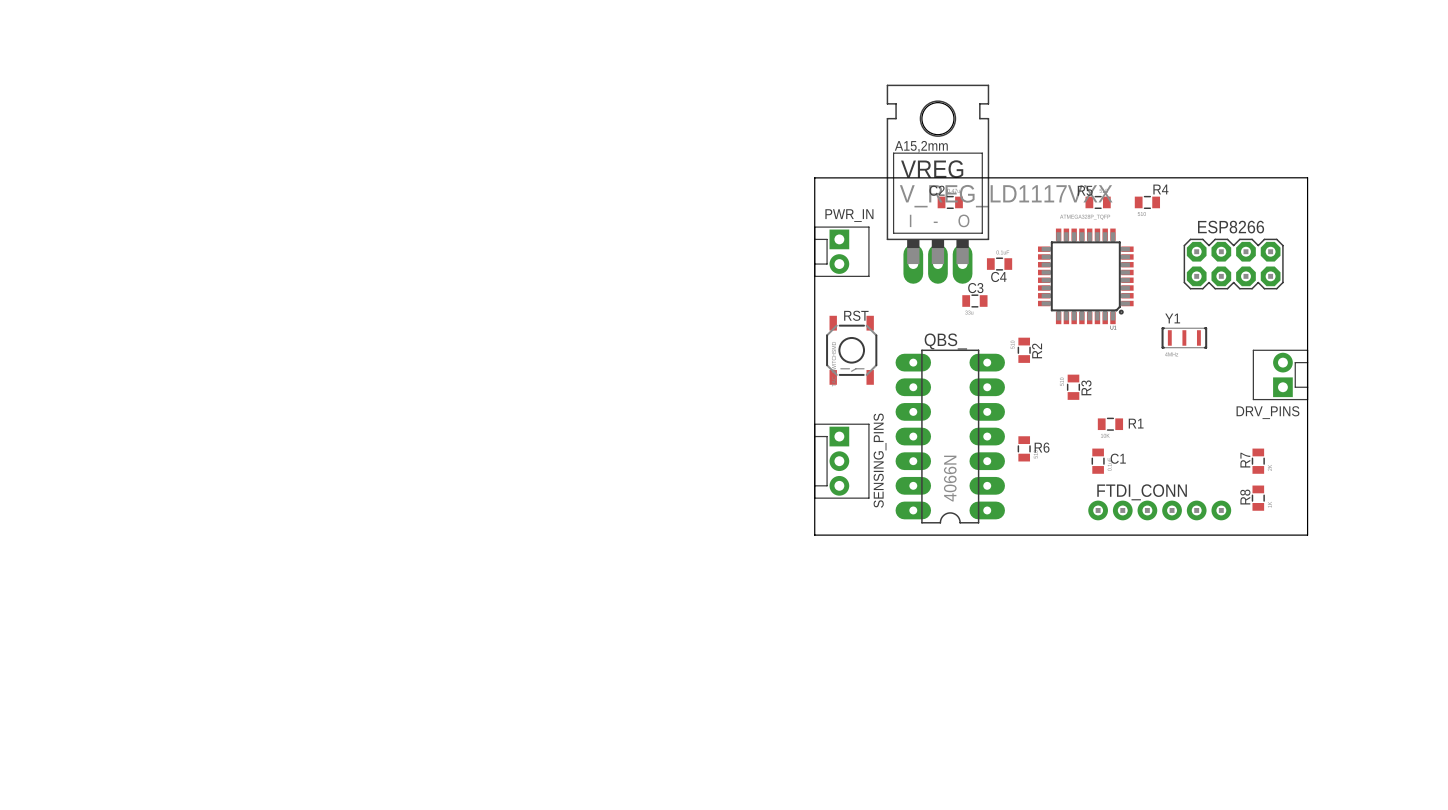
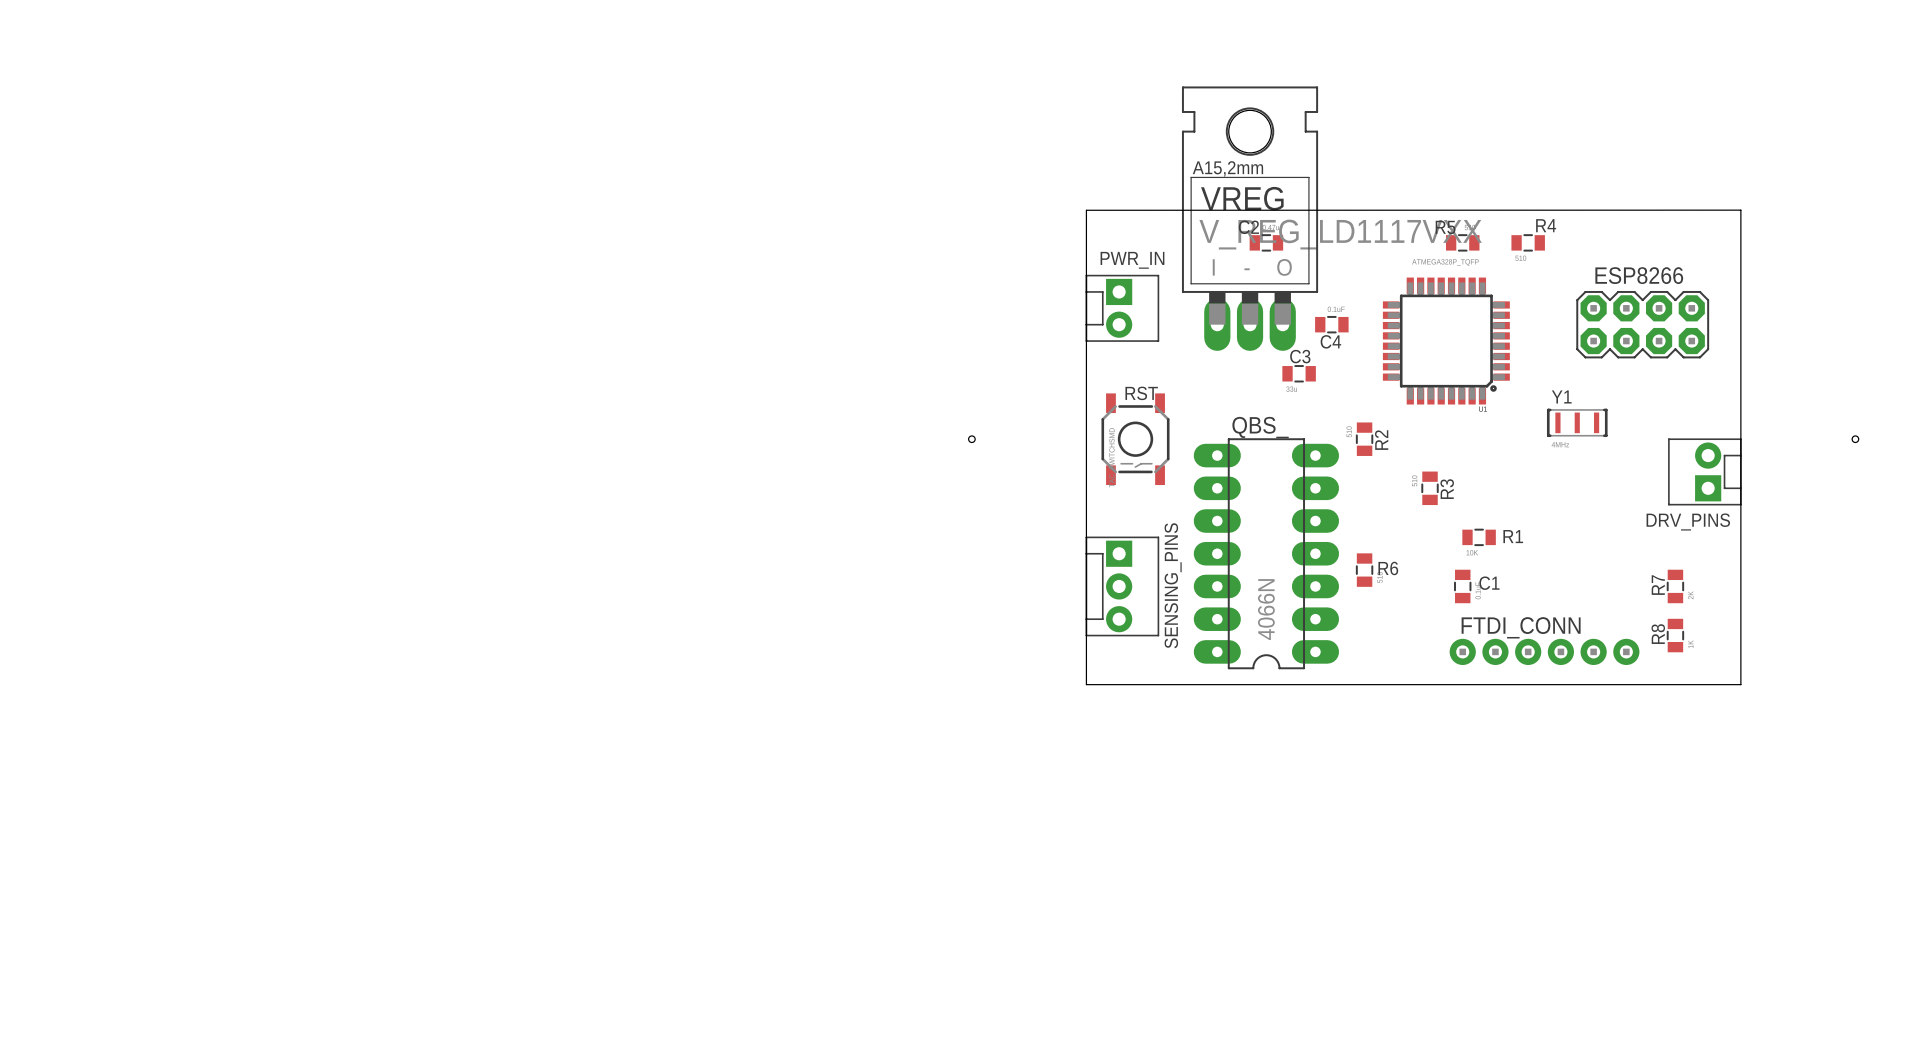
hole: none -> (971, 439)
hole: none -> (1855, 439)

